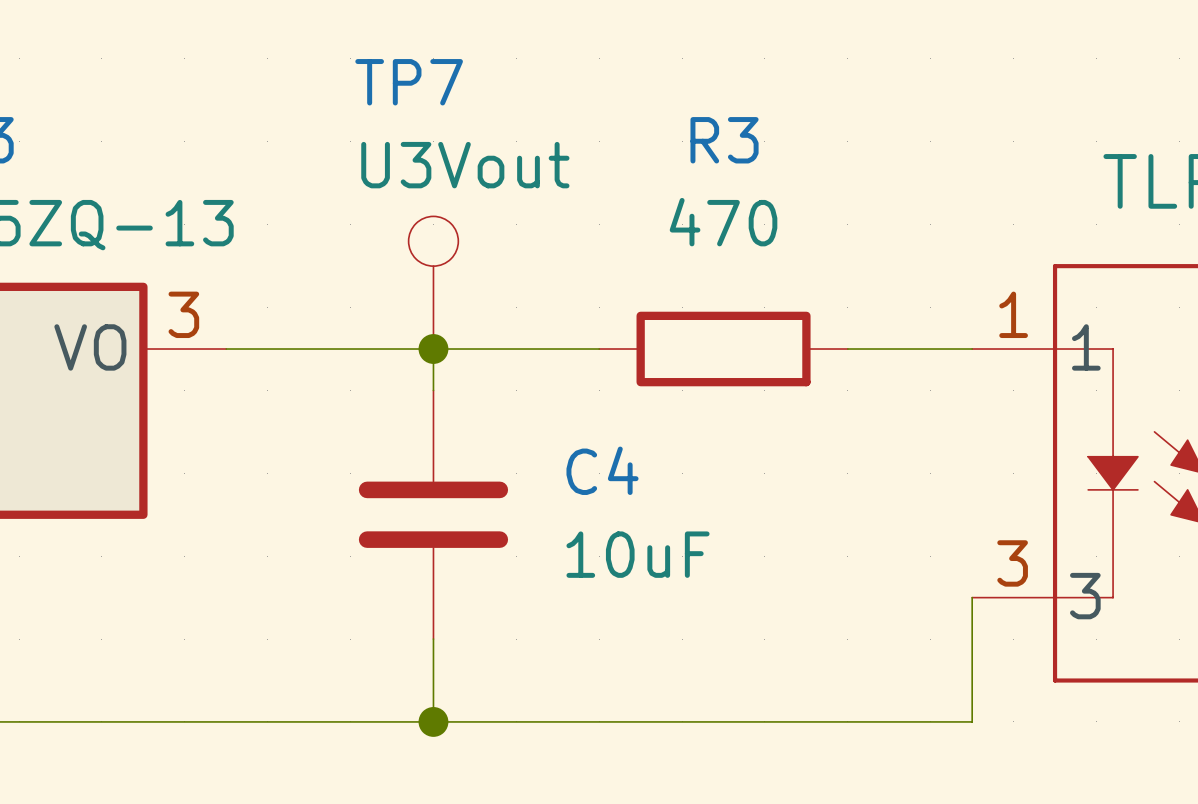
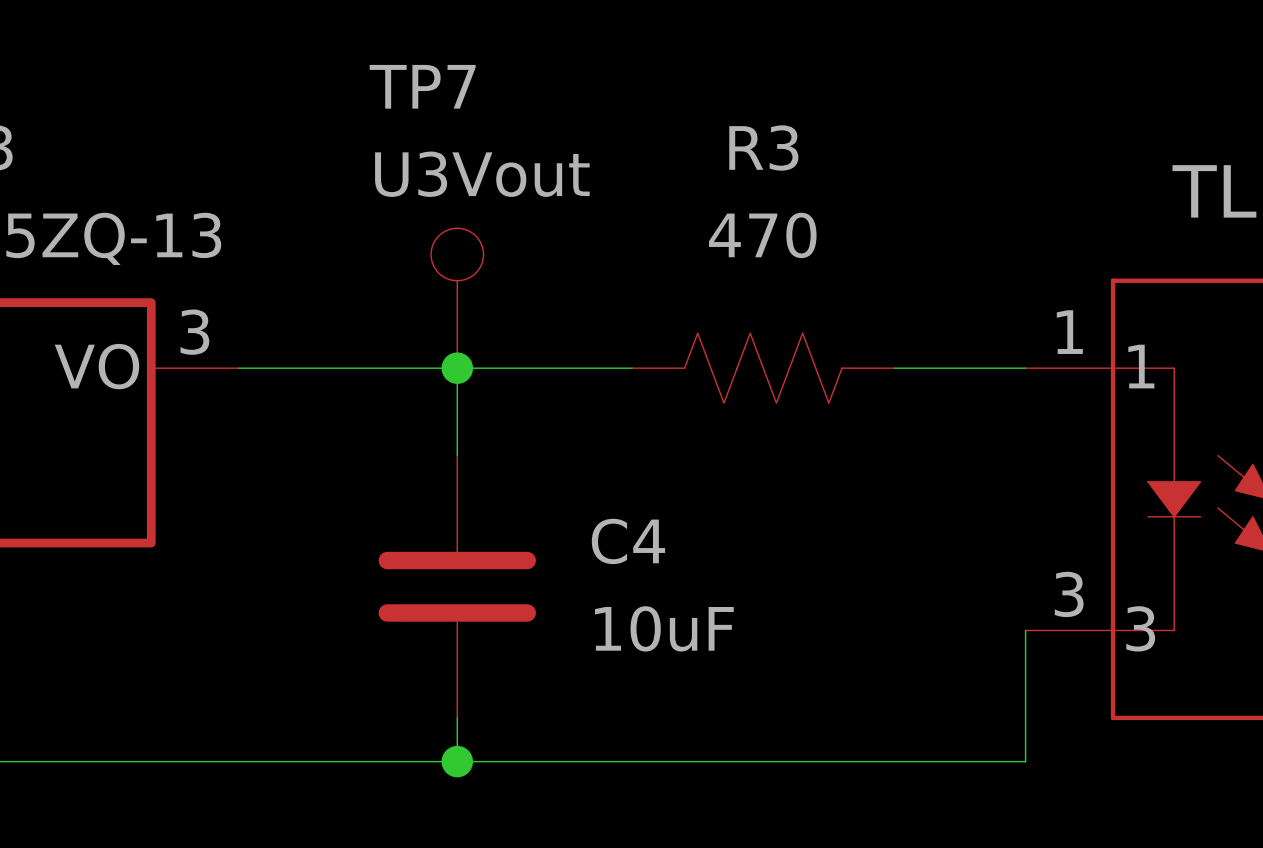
R3 symbol: [599, 311, 848, 387] -> [632, 333, 895, 404]
C4 position: (433, 514) -> (457, 586)

